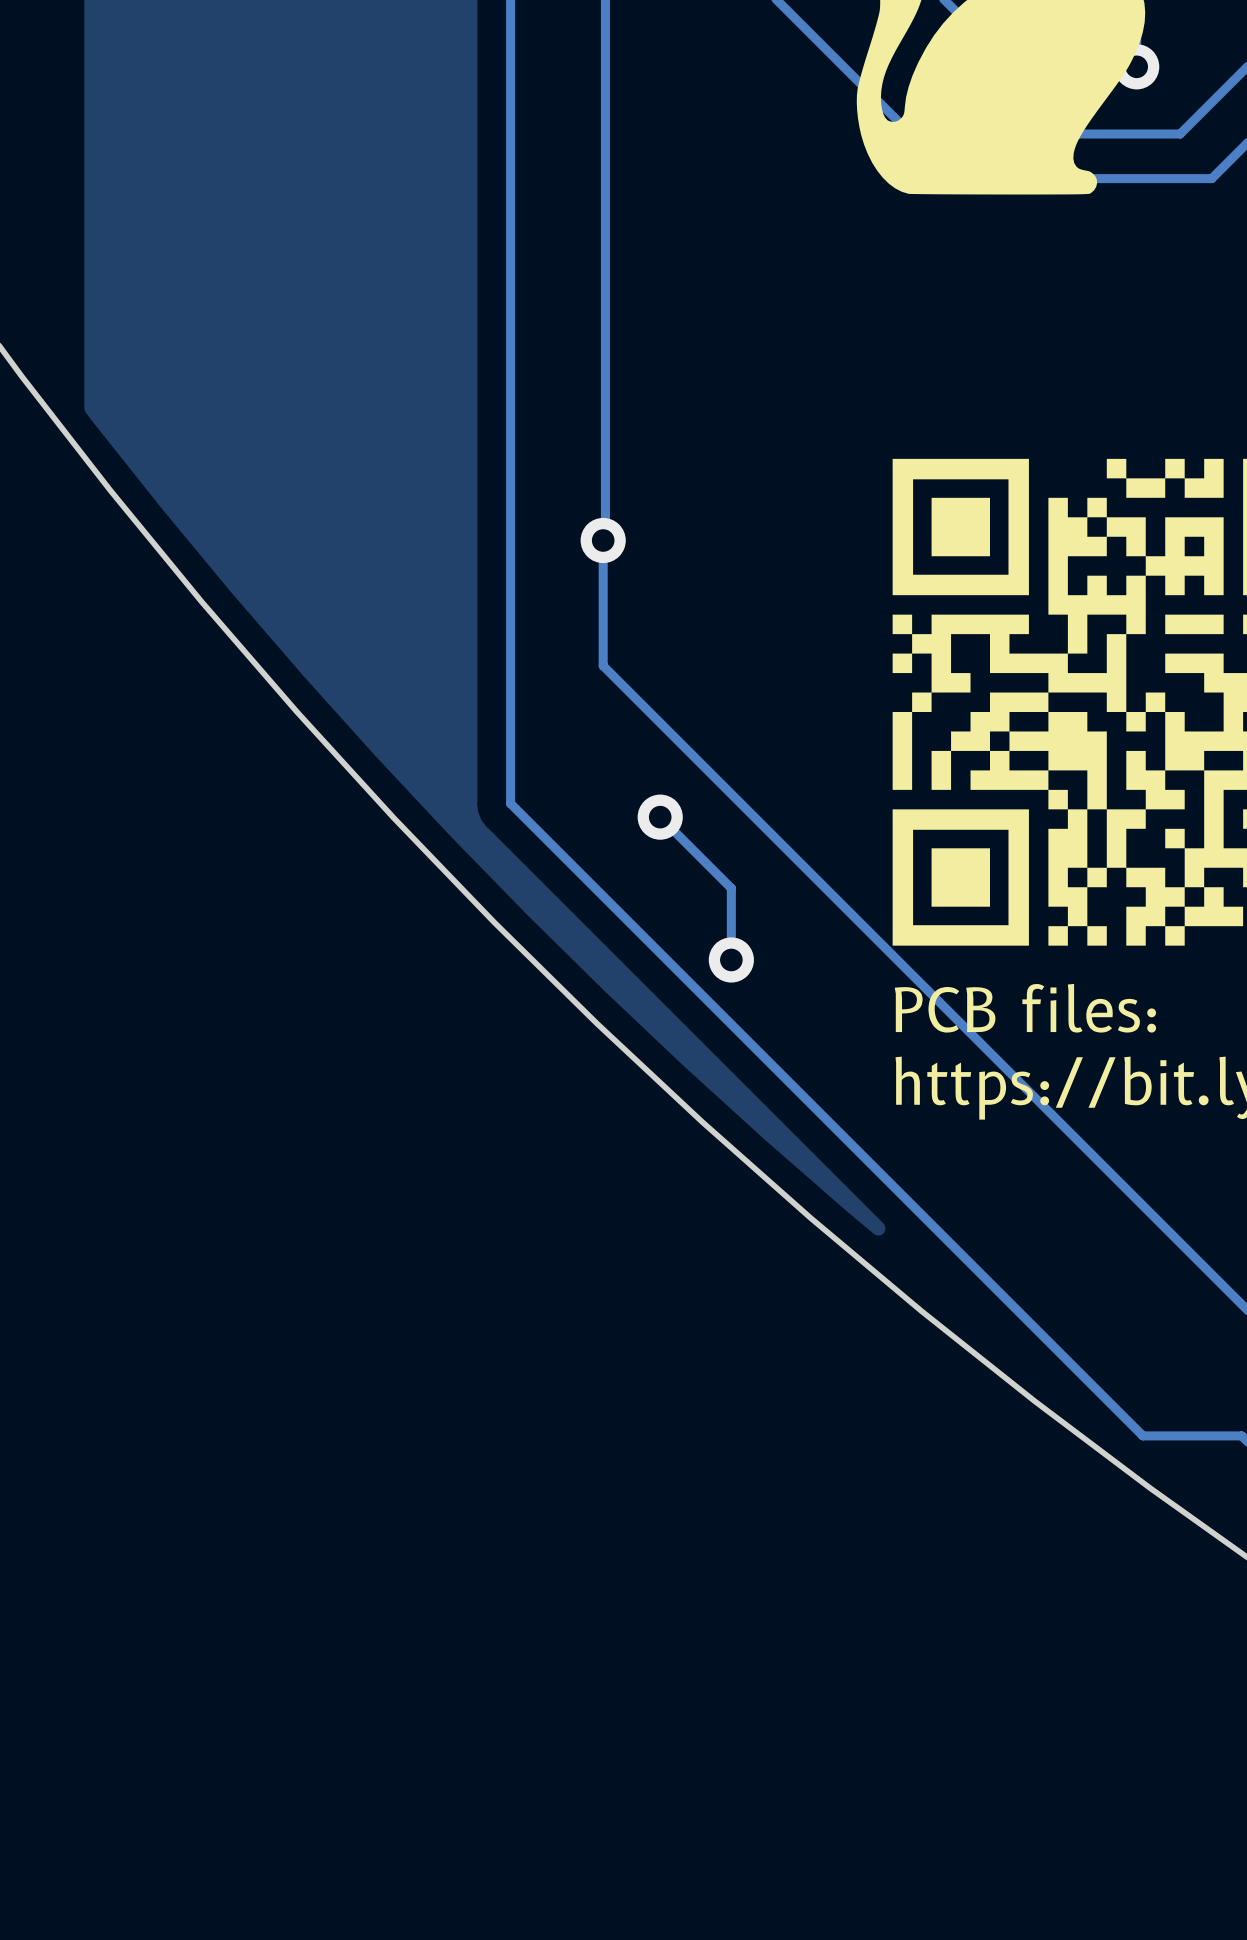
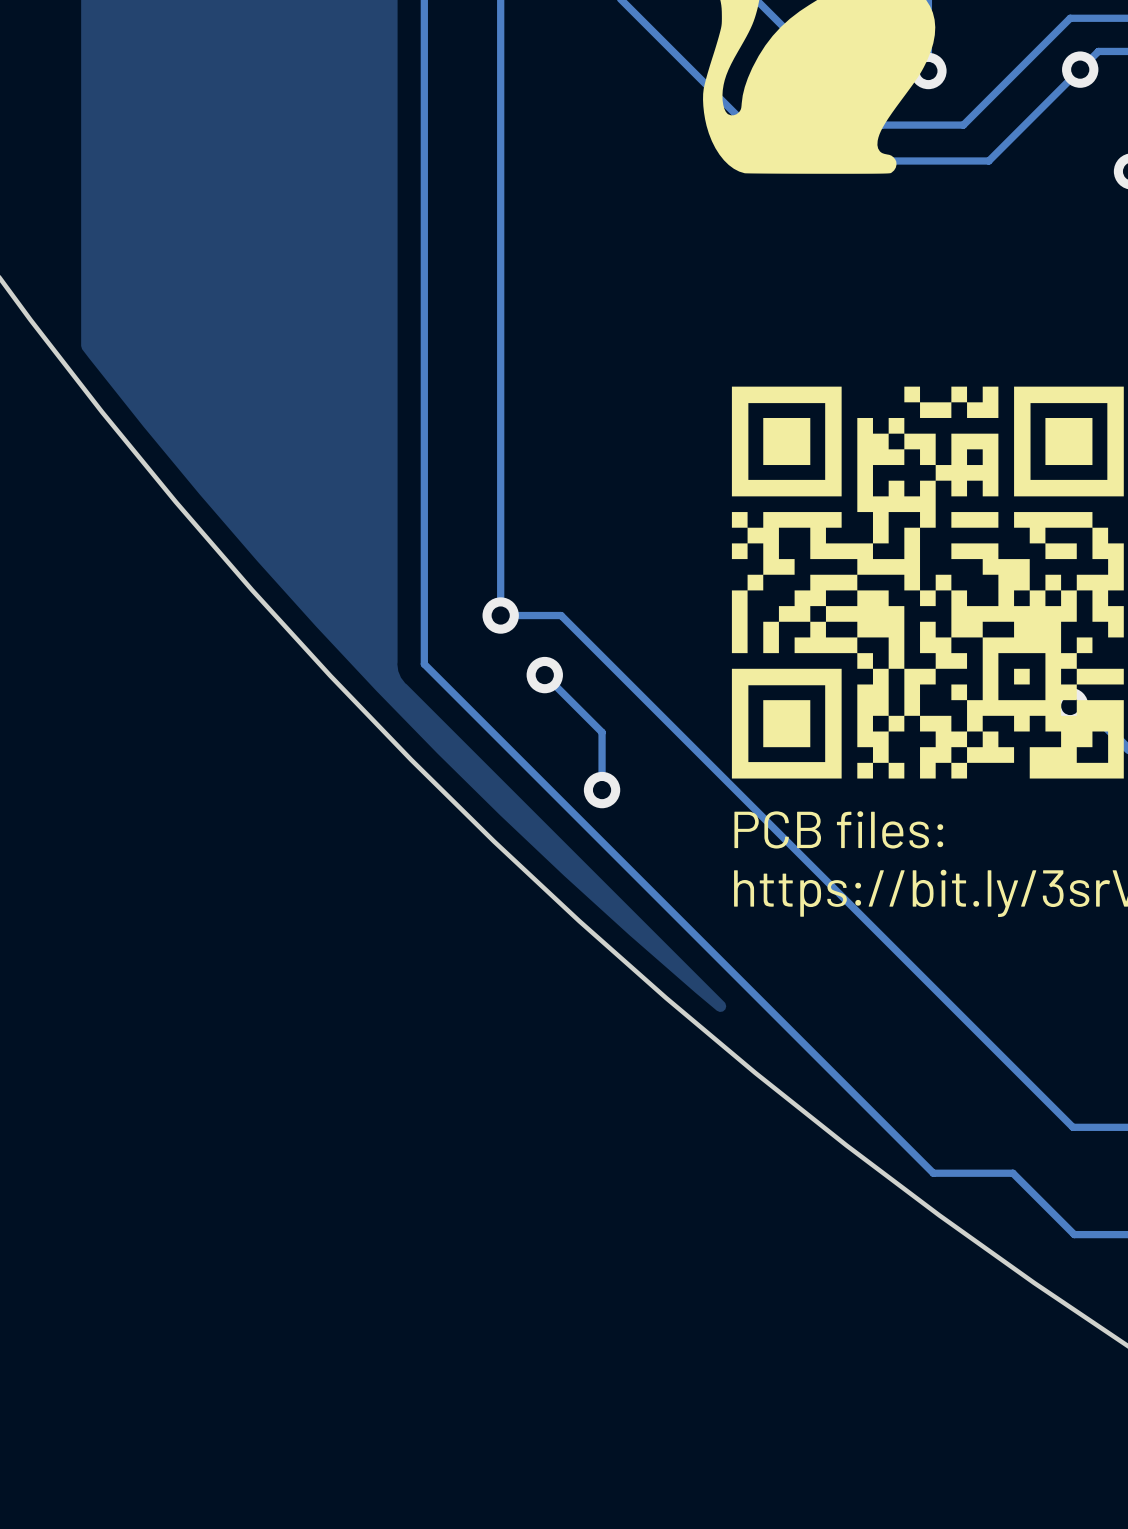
track: (605, 538) (603, 540) (603, 665) (680, 743) -> (500, 450) (500, 615) (561, 615)
via position: (603, 540) -> (500, 615)

